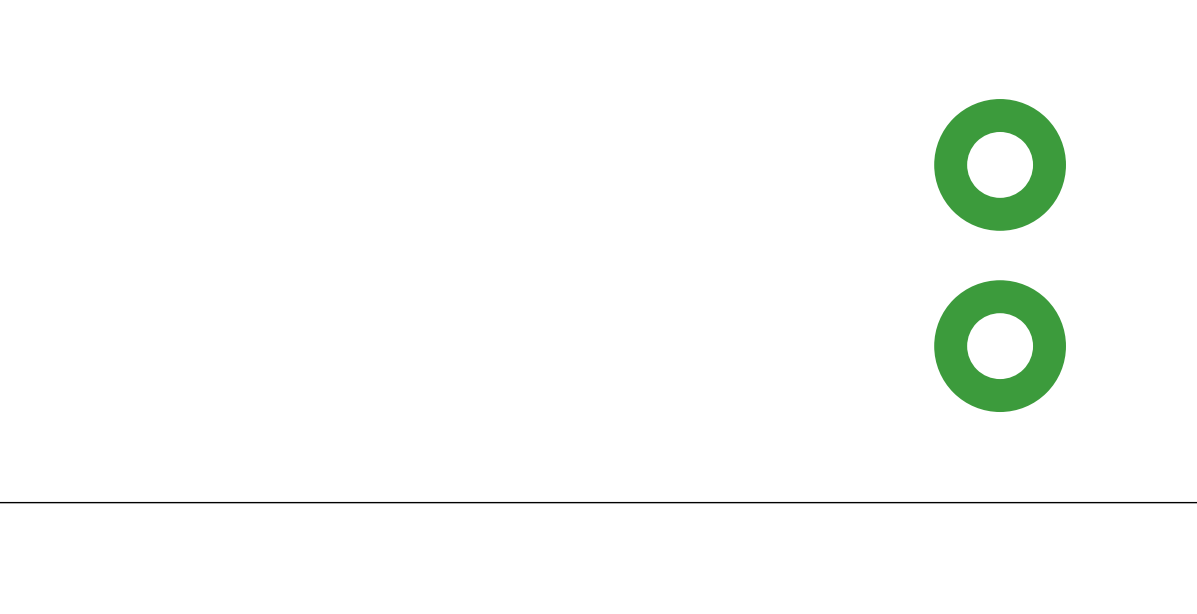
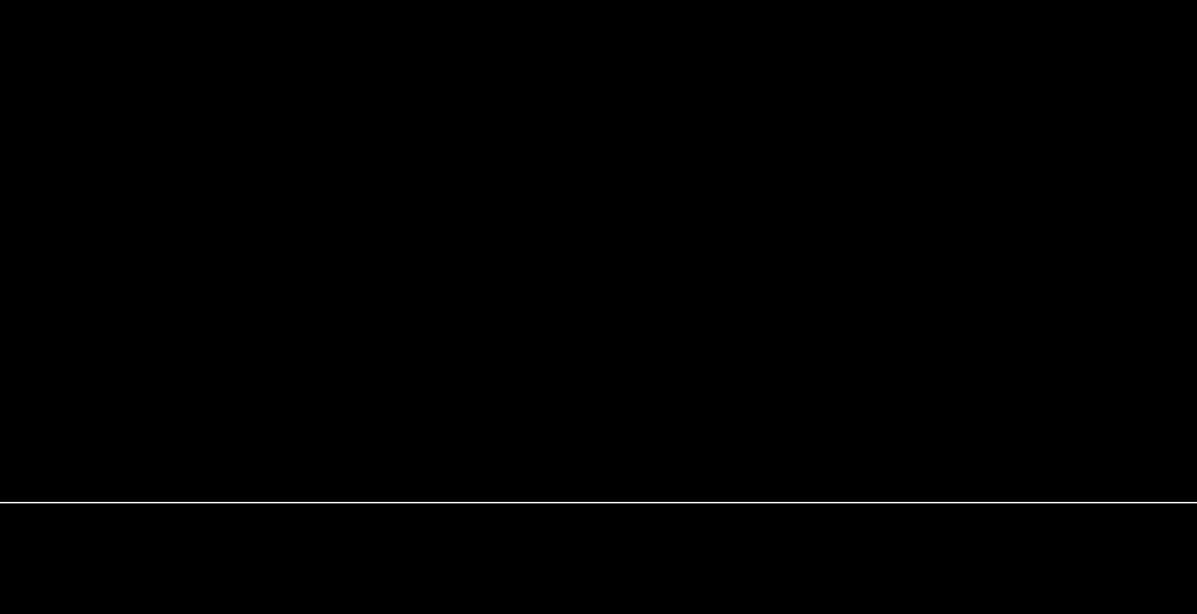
part: (1000, 255) -> none

